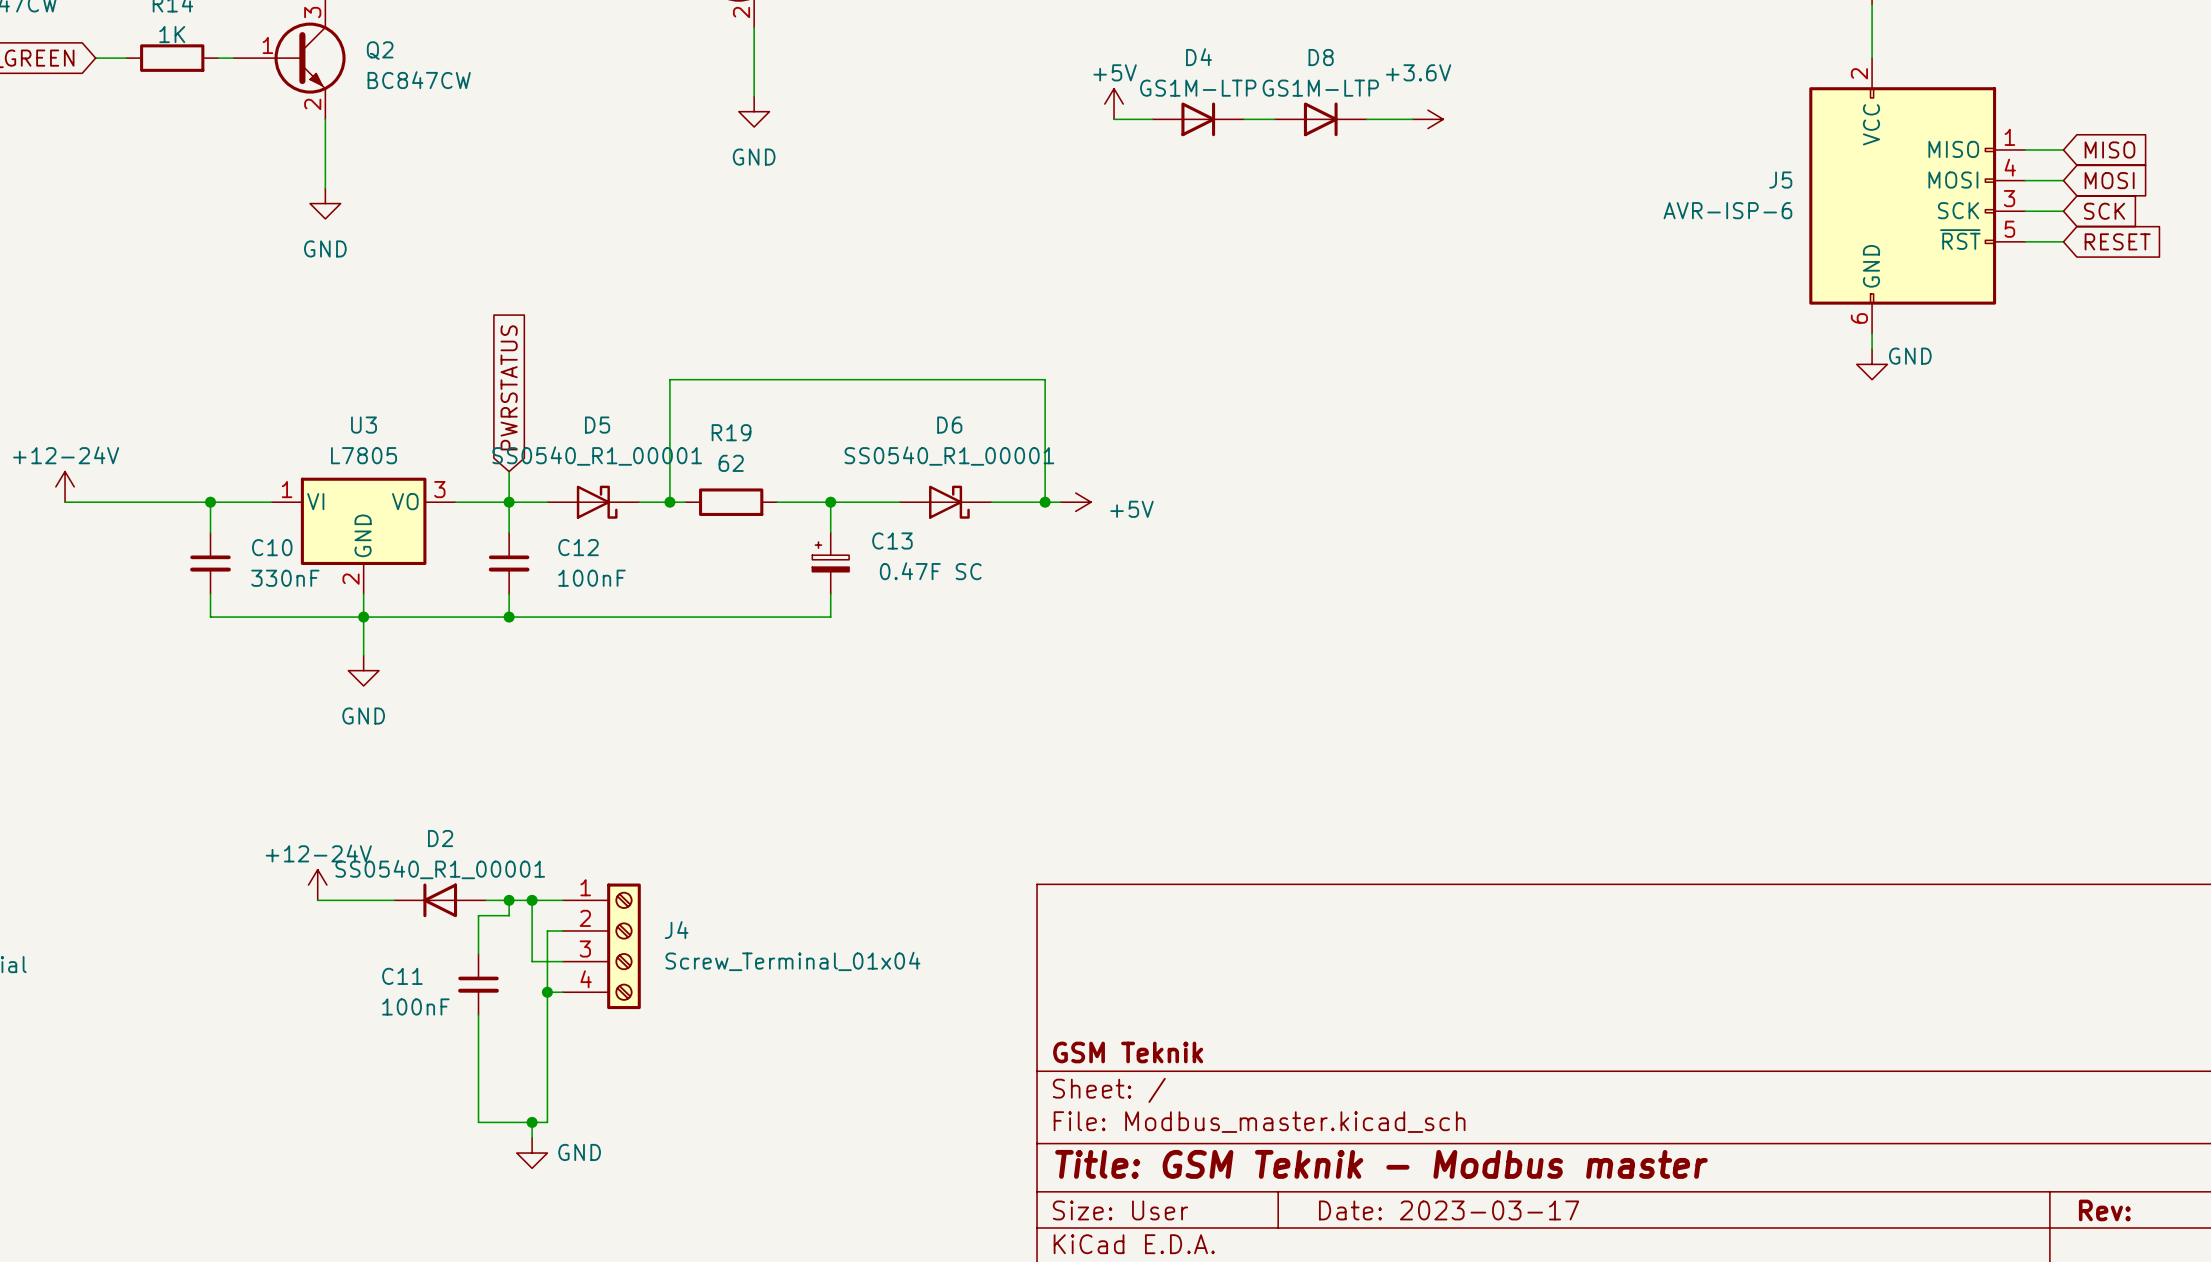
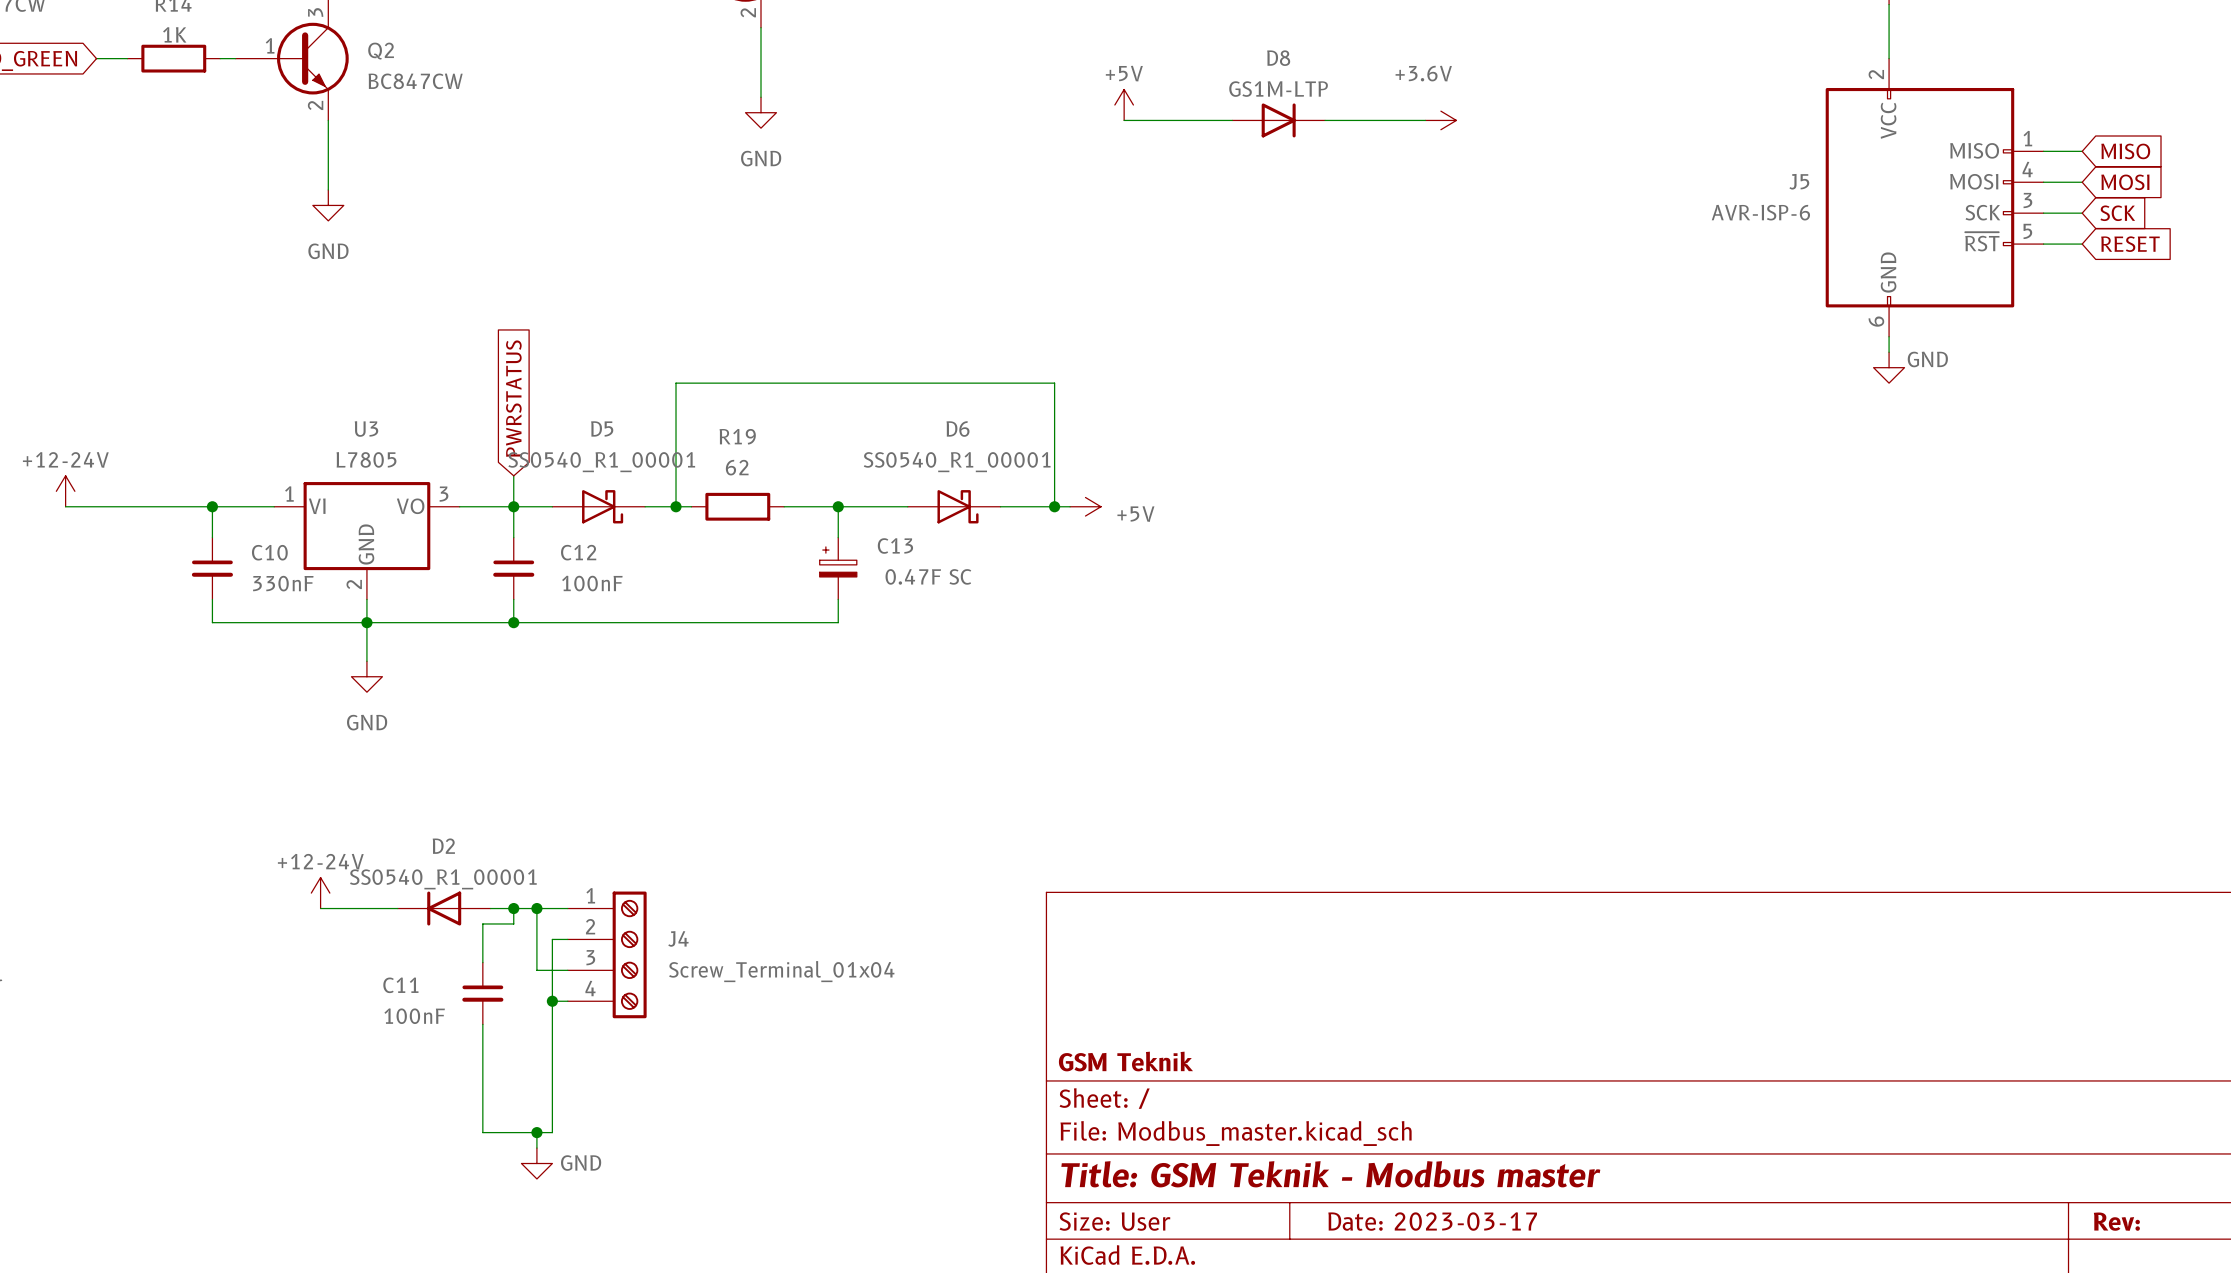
D4: GS1M-LTP (1198, 119) -> none
D8 position: (1320, 119) -> (1278, 120)

